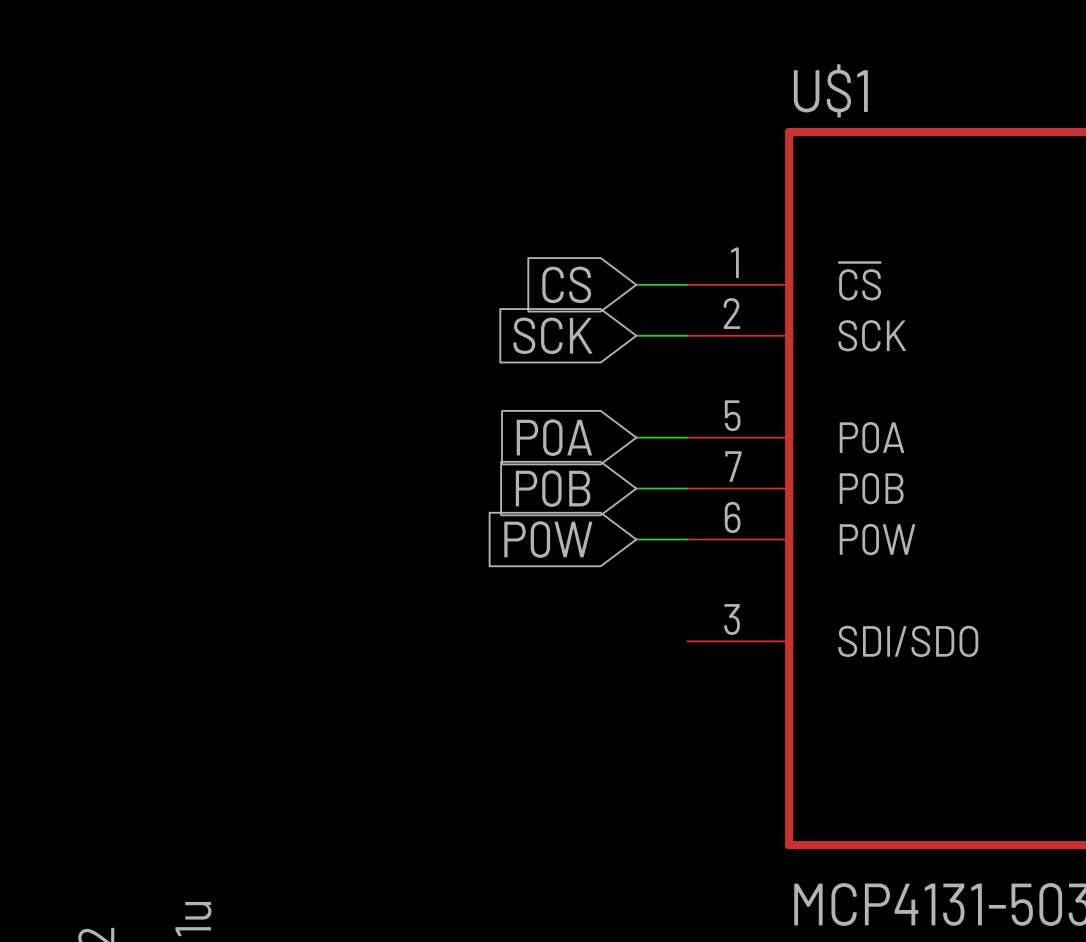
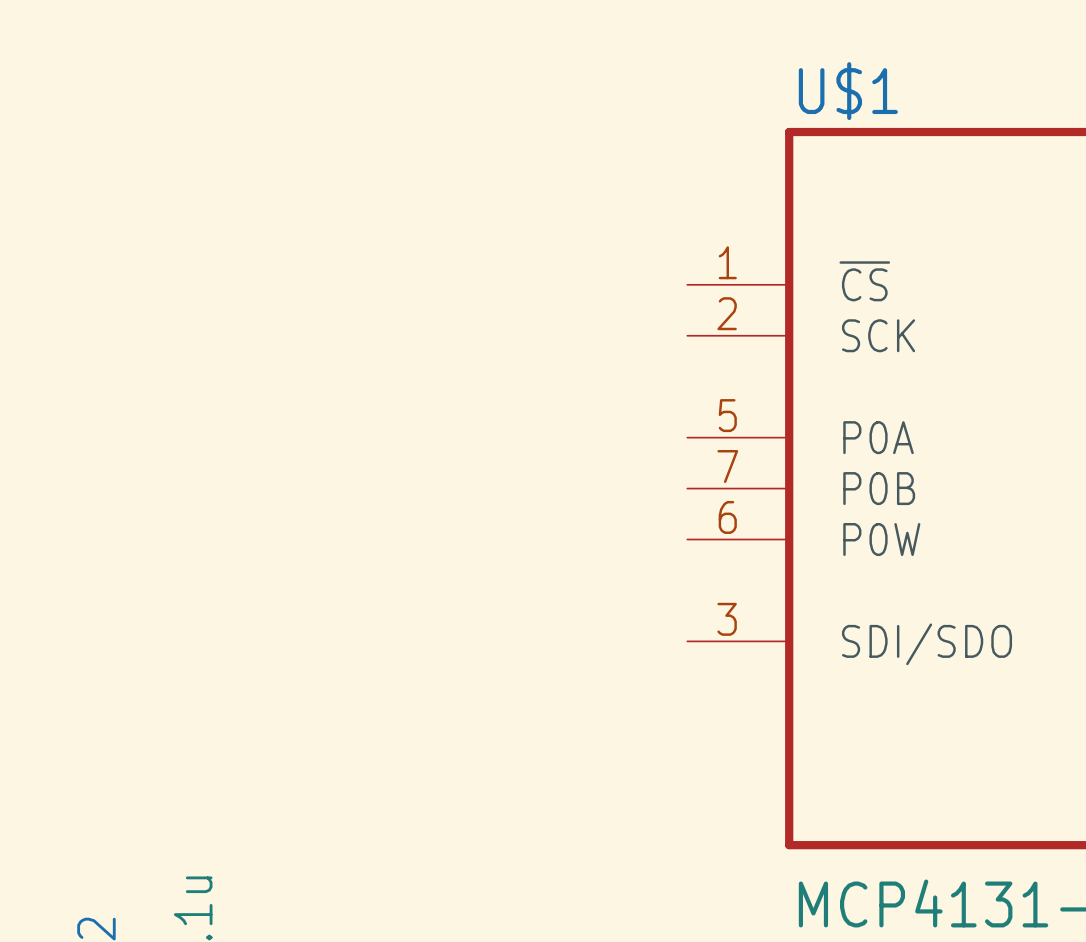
global label: CS (566, 284) -> none
wire: (636, 284) (687, 284) -> none
global label: SCK (552, 335) -> none
wire: (636, 335) (687, 335) -> none
global label: P0A (554, 437) -> none
wire: (636, 437) (687, 437) -> none
global label: P0B (553, 488) -> none
wire: (636, 488) (687, 488) -> none
global label: P0W (548, 539) -> none
wire: (636, 539) (687, 539) -> none

